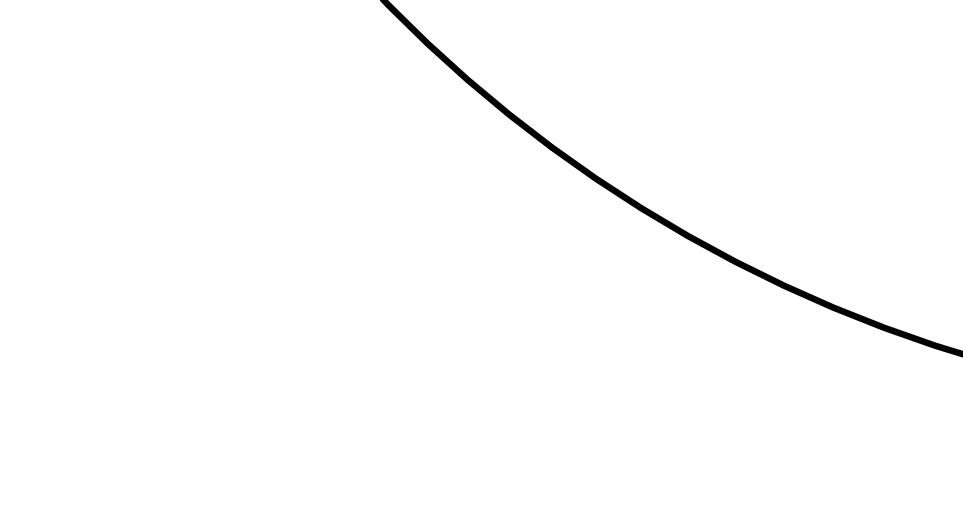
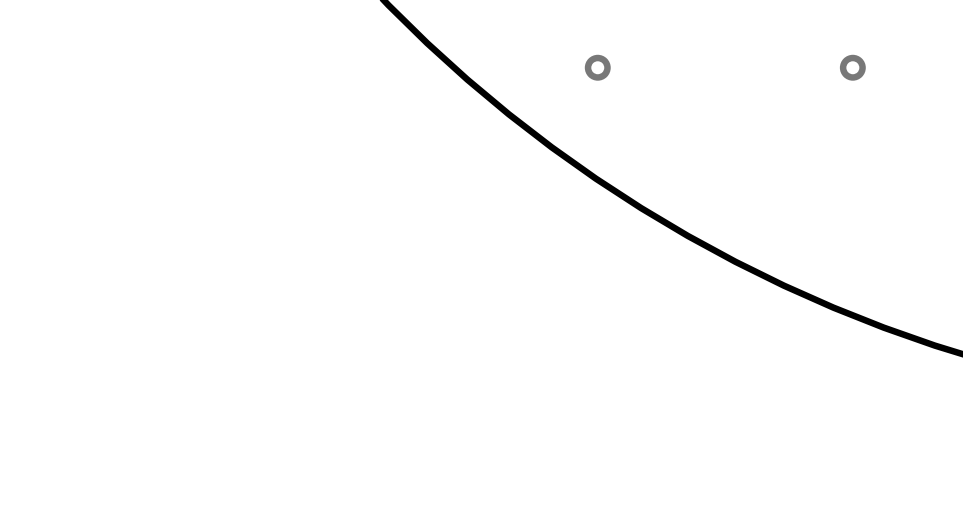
via: none -> (597, 67)
via: none -> (852, 67)

